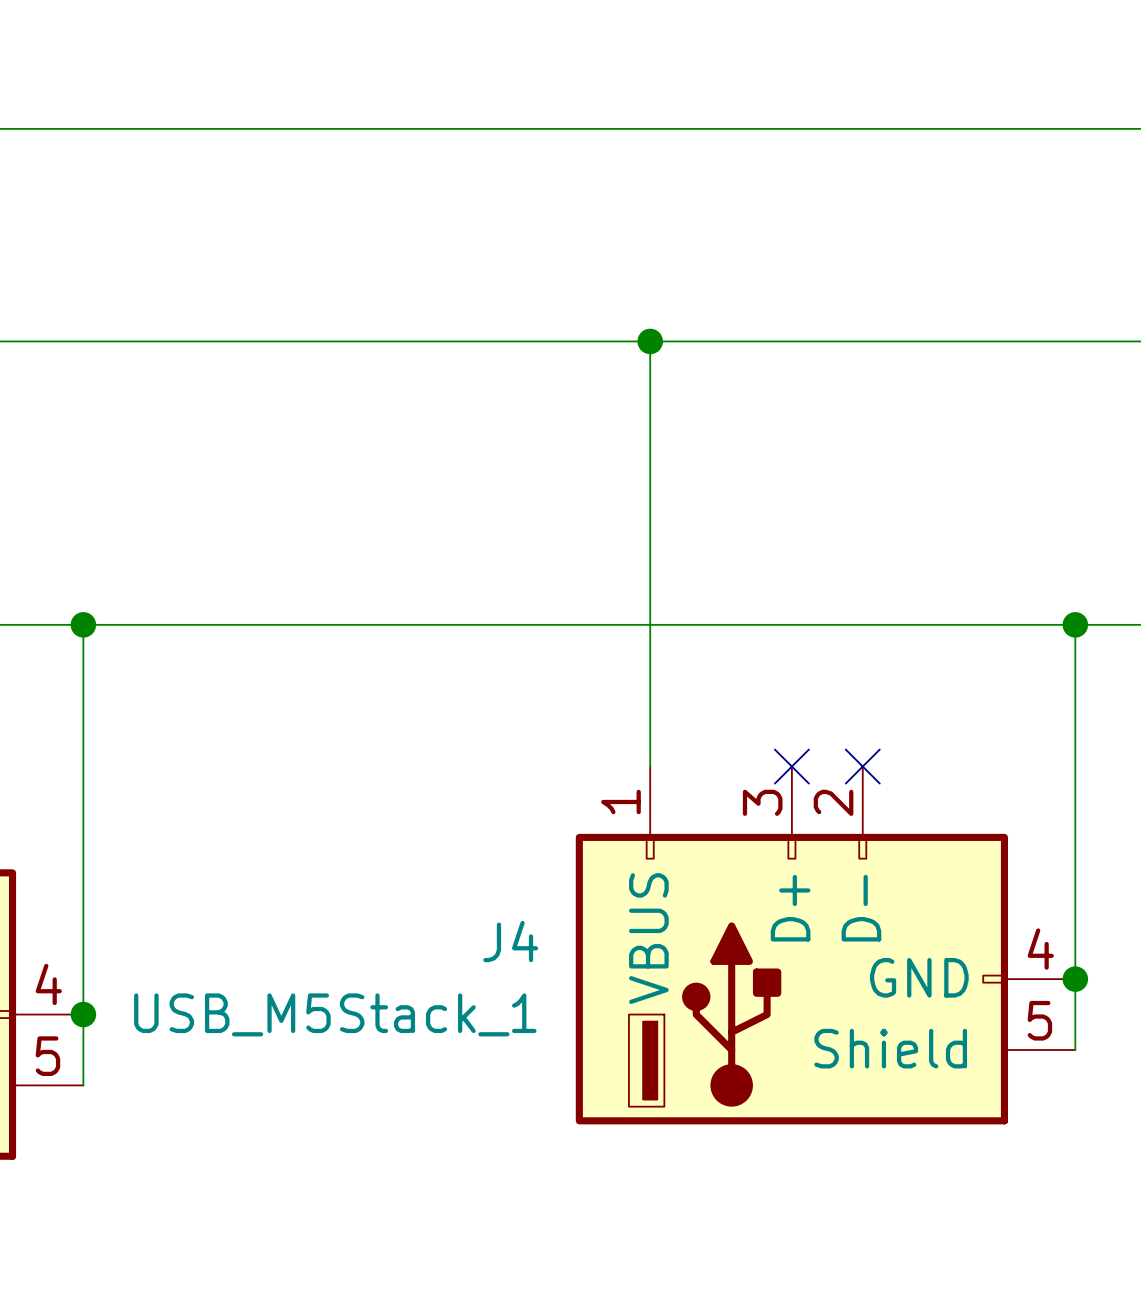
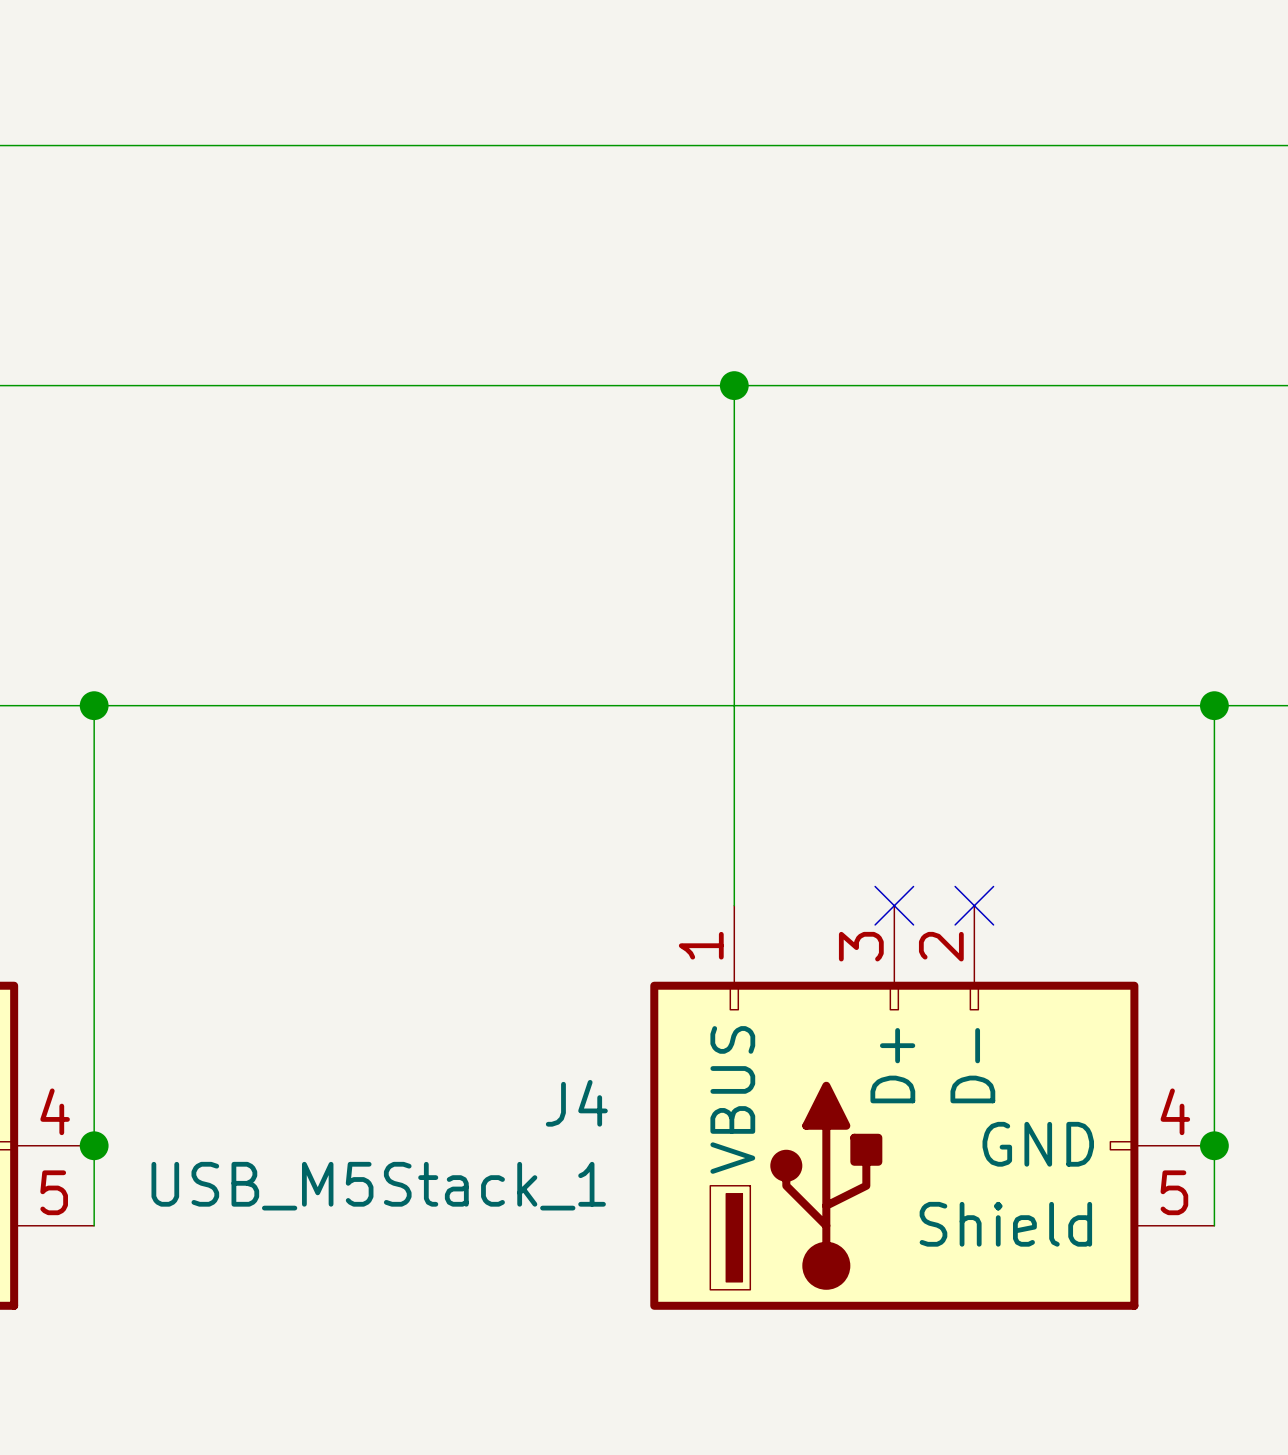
no-connect mark position: (791, 766) -> (894, 905)
no-connect mark position: (862, 766) -> (974, 905)
J4 position: (825, 945) -> (932, 1107)
junction position: (1075, 979) -> (1214, 1145)
wire: none -> (1214, 1185) (1214, 1225)

